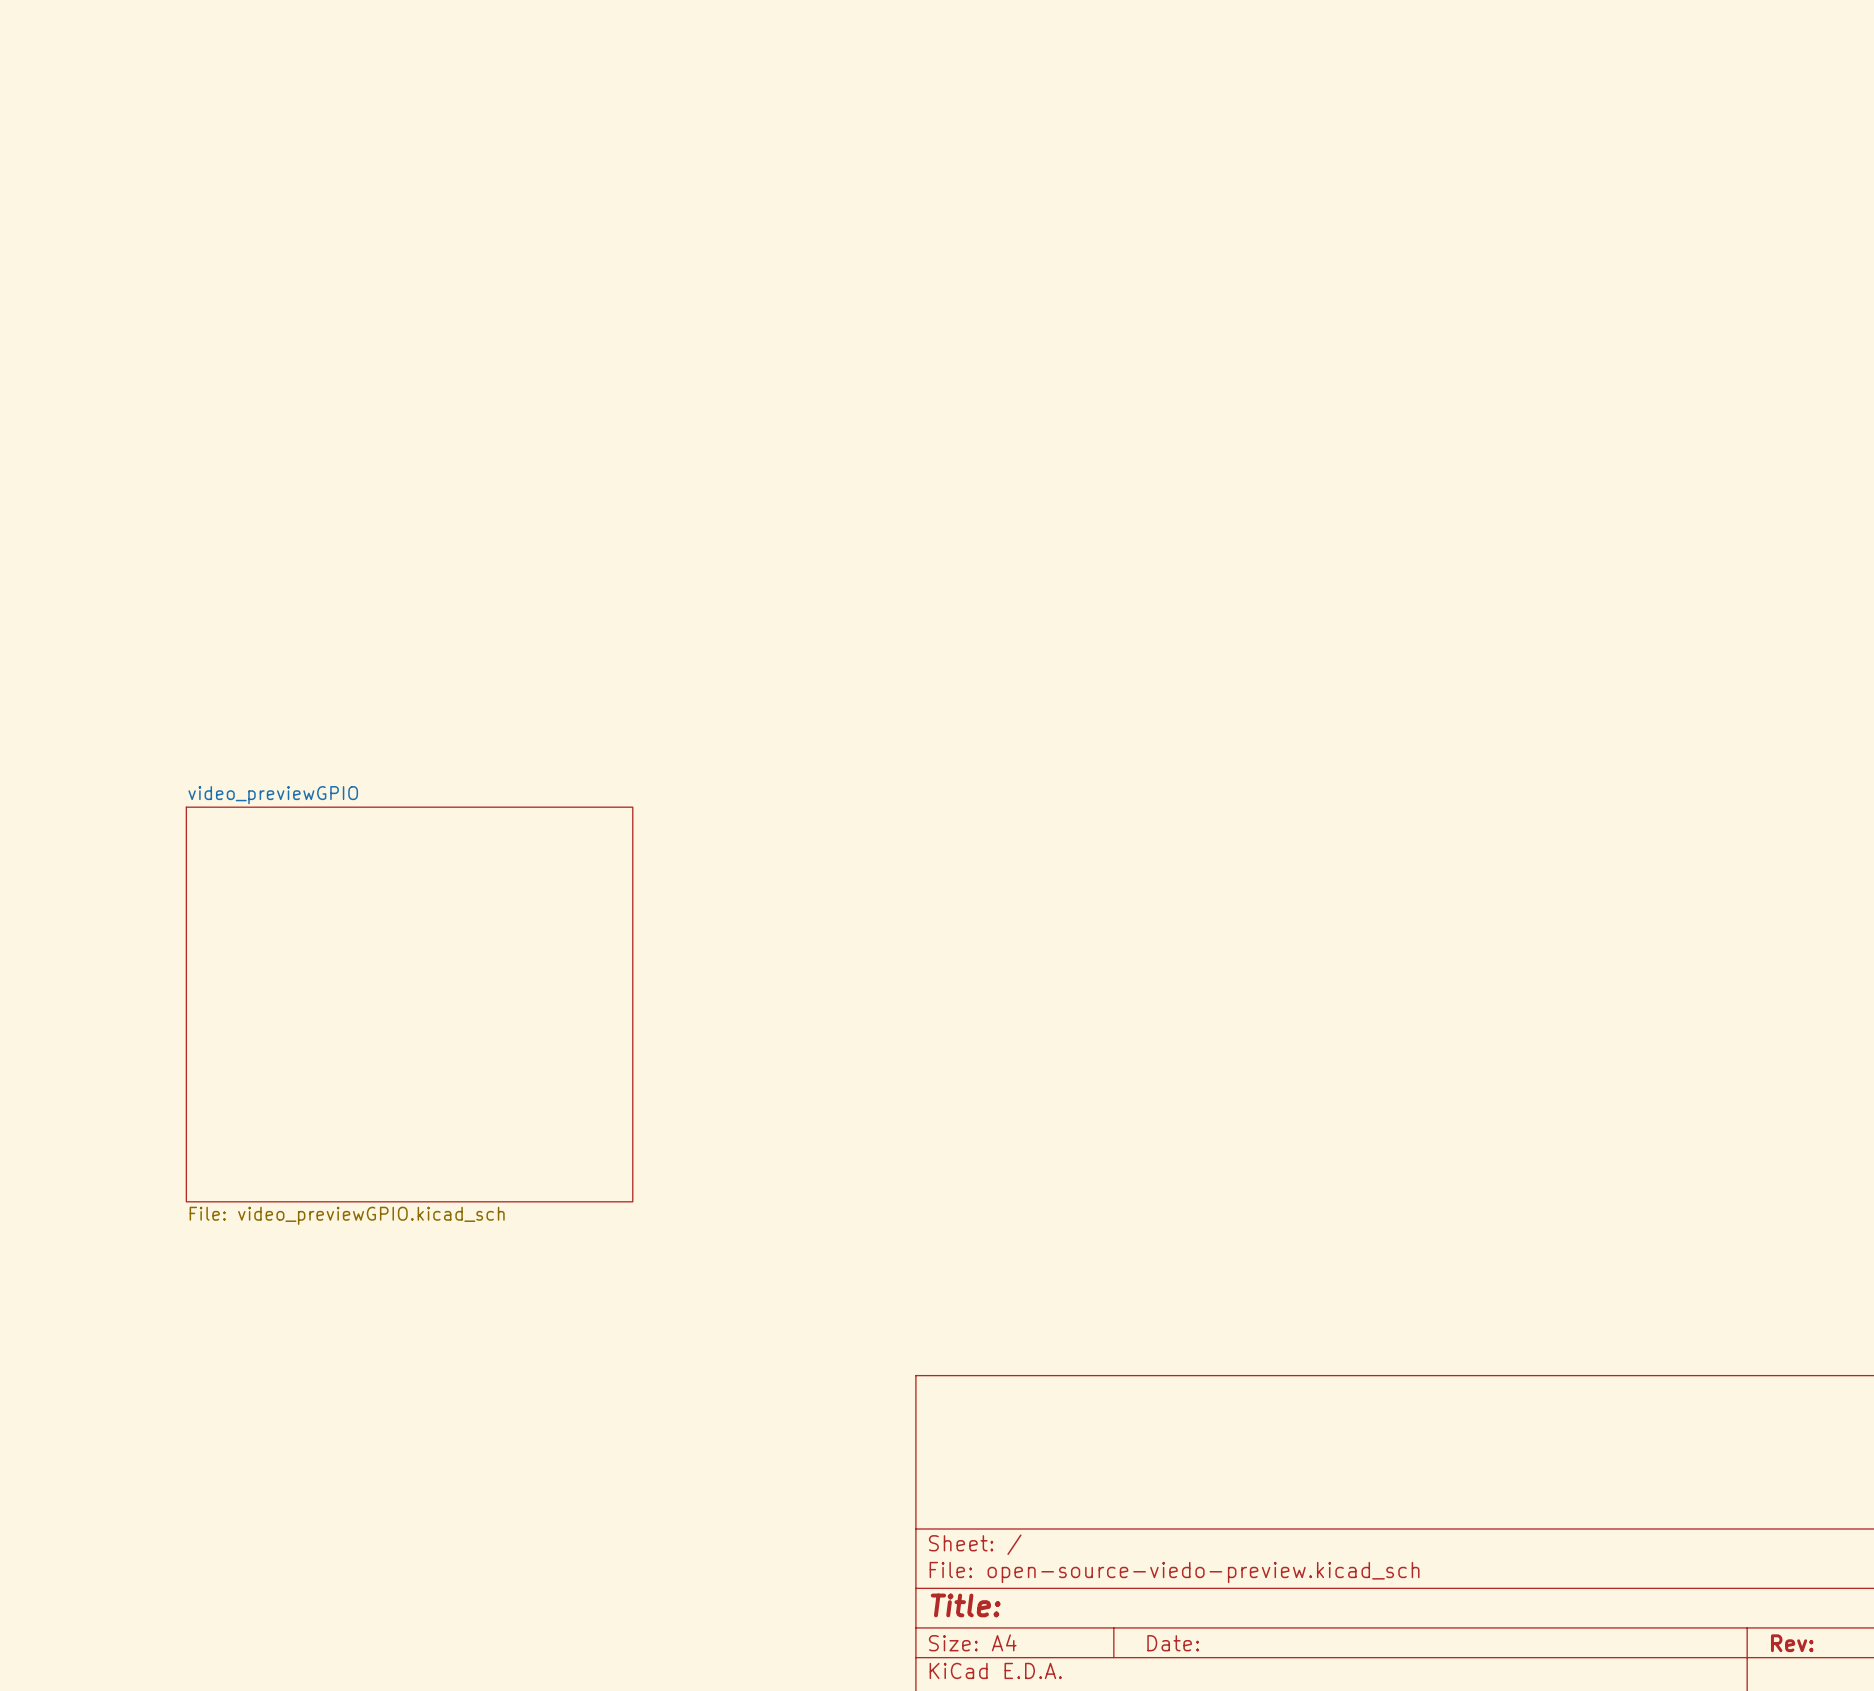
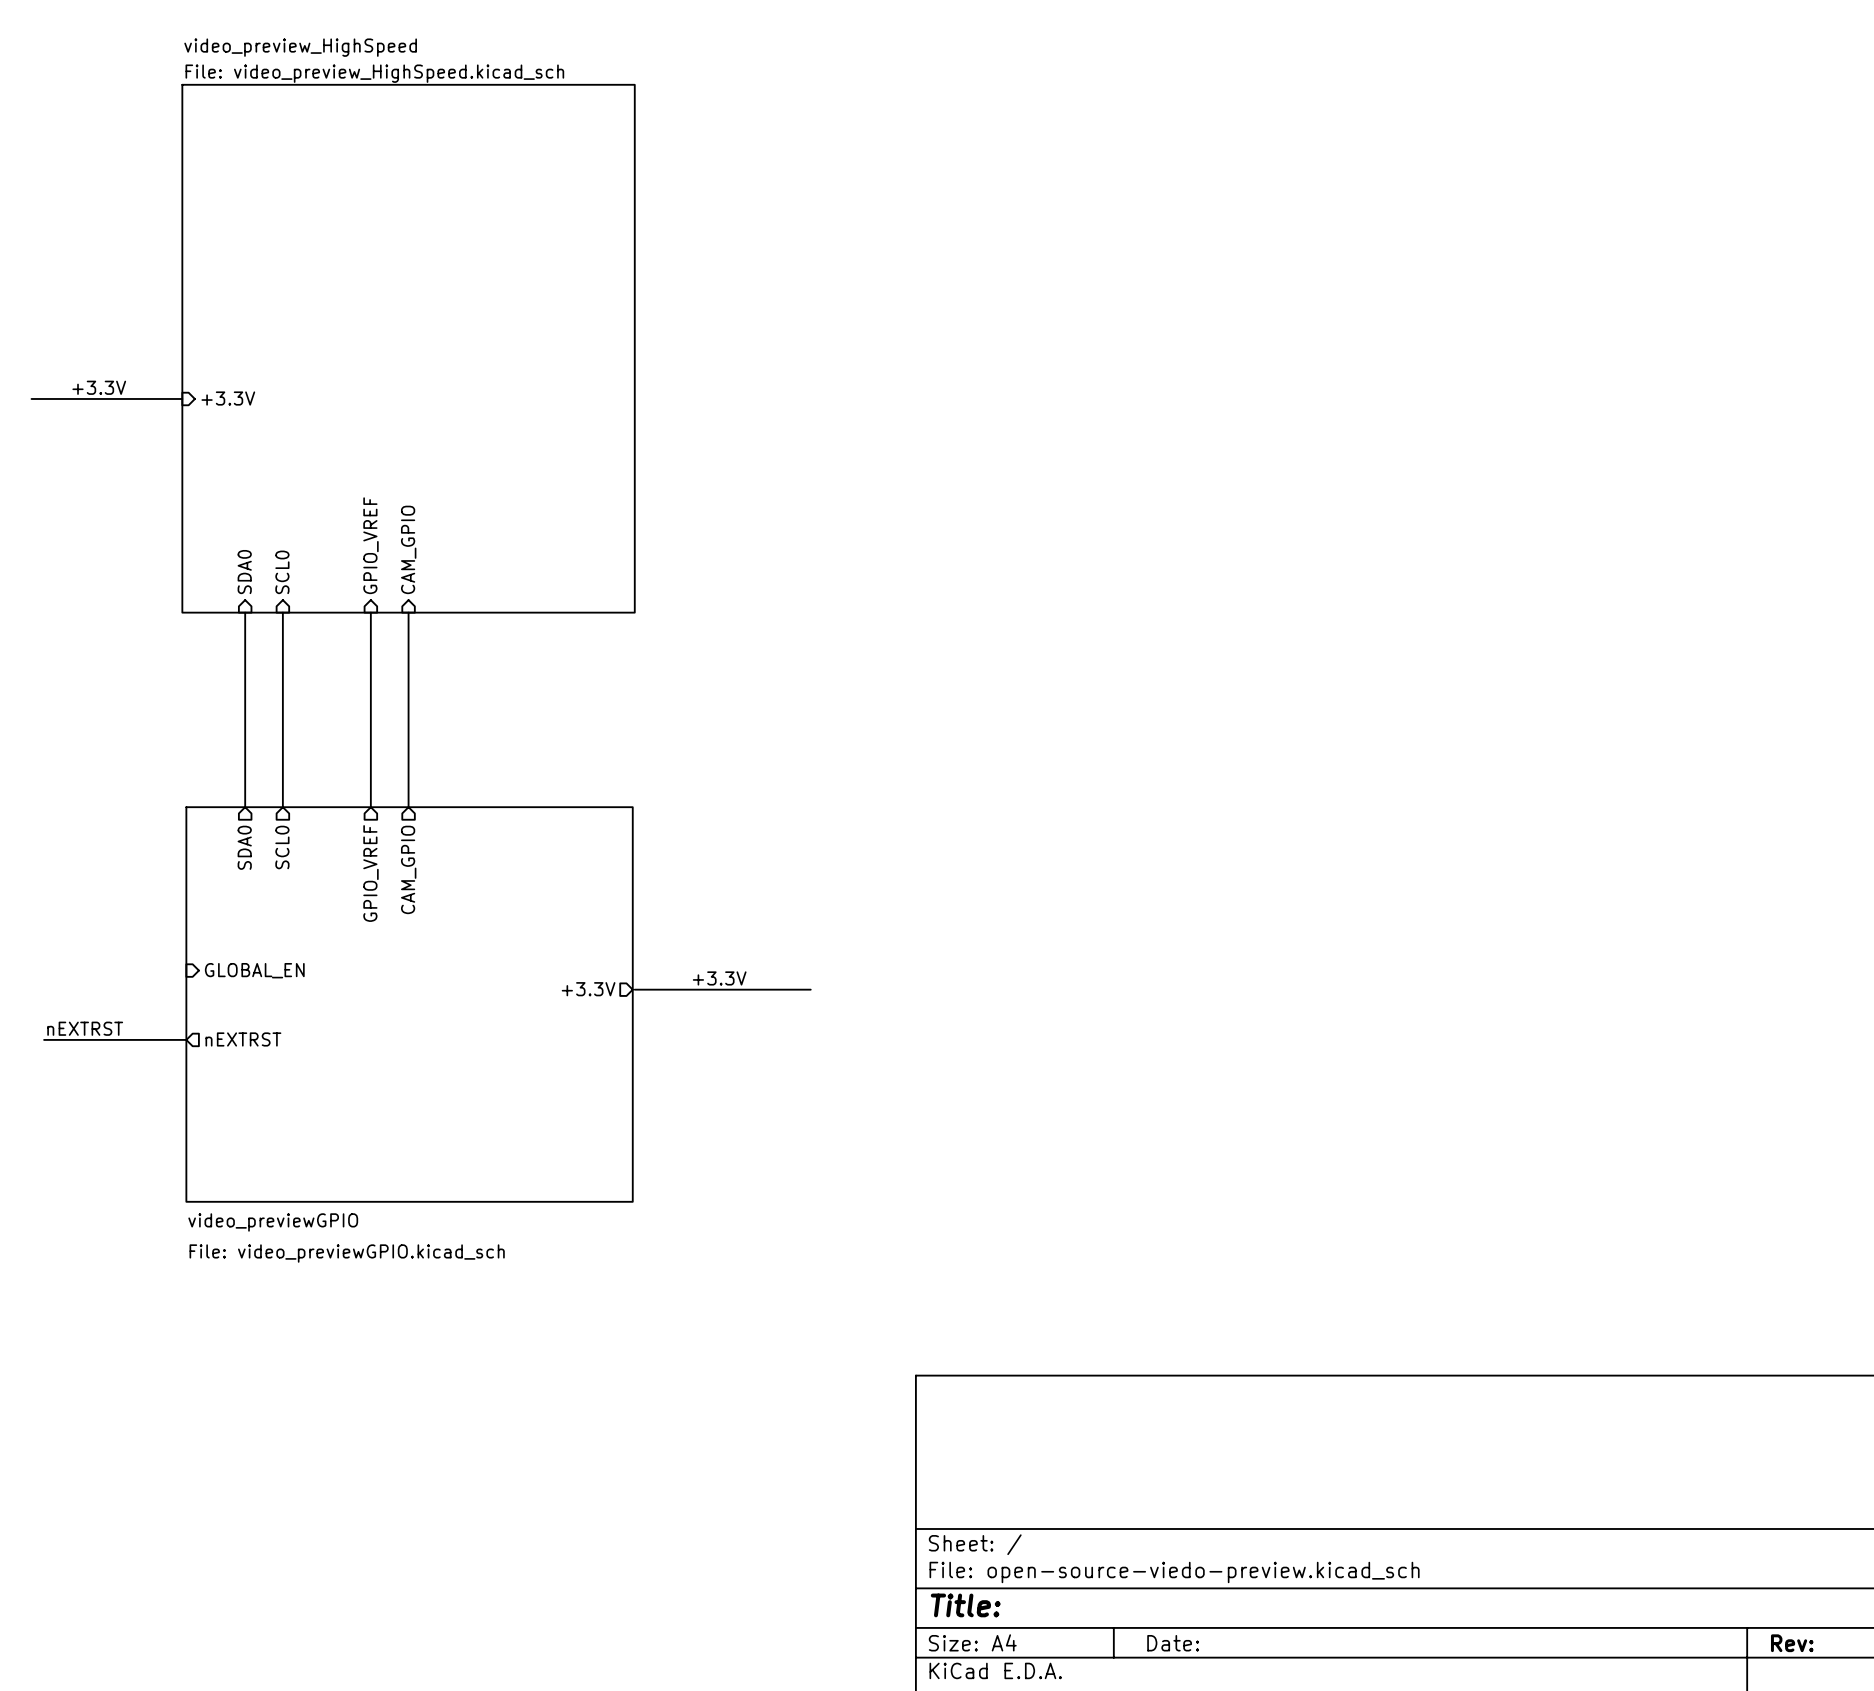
sheet video_preview_HighSpeed: none -> File: video_preview_HighSpeed.kicad_sch (408, 348)
label: none -> +3.3V (99, 387)
wire: none -> (31, 398) (182, 398)
sheet pin: none -> +3.3V (228, 398)
sheet pin: none -> GPIO_VREF (370, 545)
sheet pin: none -> CAM_GPIO (408, 549)
sheet pin: none -> SDA0 (244, 572)
sheet pin: none -> SCL0 (282, 572)
wire: none -> (245, 612) (245, 807)
wire: none -> (282, 612) (282, 807)
wire: none -> (370, 612) (370, 807)
wire: none -> (408, 612) (408, 807)
sheet video_previewGPIO name position: video_previewGPIO (273, 795) -> video_previewGPIO (273, 1222)
sheet pin: none -> SDA0 (244, 847)
sheet pin: none -> SCL0 (282, 847)
sheet pin: none -> CAM_GPIO (408, 869)
sheet pin: none -> GPIO_VREF (370, 873)
sheet pin: none -> GLOBAL_EN (254, 970)
label: none -> +3.3V (719, 978)
sheet pin: none -> +3.3V (588, 989)
wire: none -> (634, 989) (810, 989)
label: none -> nEXTRST (85, 1028)
wire: none -> (44, 1039) (186, 1039)
sheet pin: none -> nEXTRST (243, 1039)
sheet video_previewGPIO value position: File: video_previewGPIO.kicad_sch (347, 1215) -> File: video_previewGPIO.kicad_sch (347, 1253)

